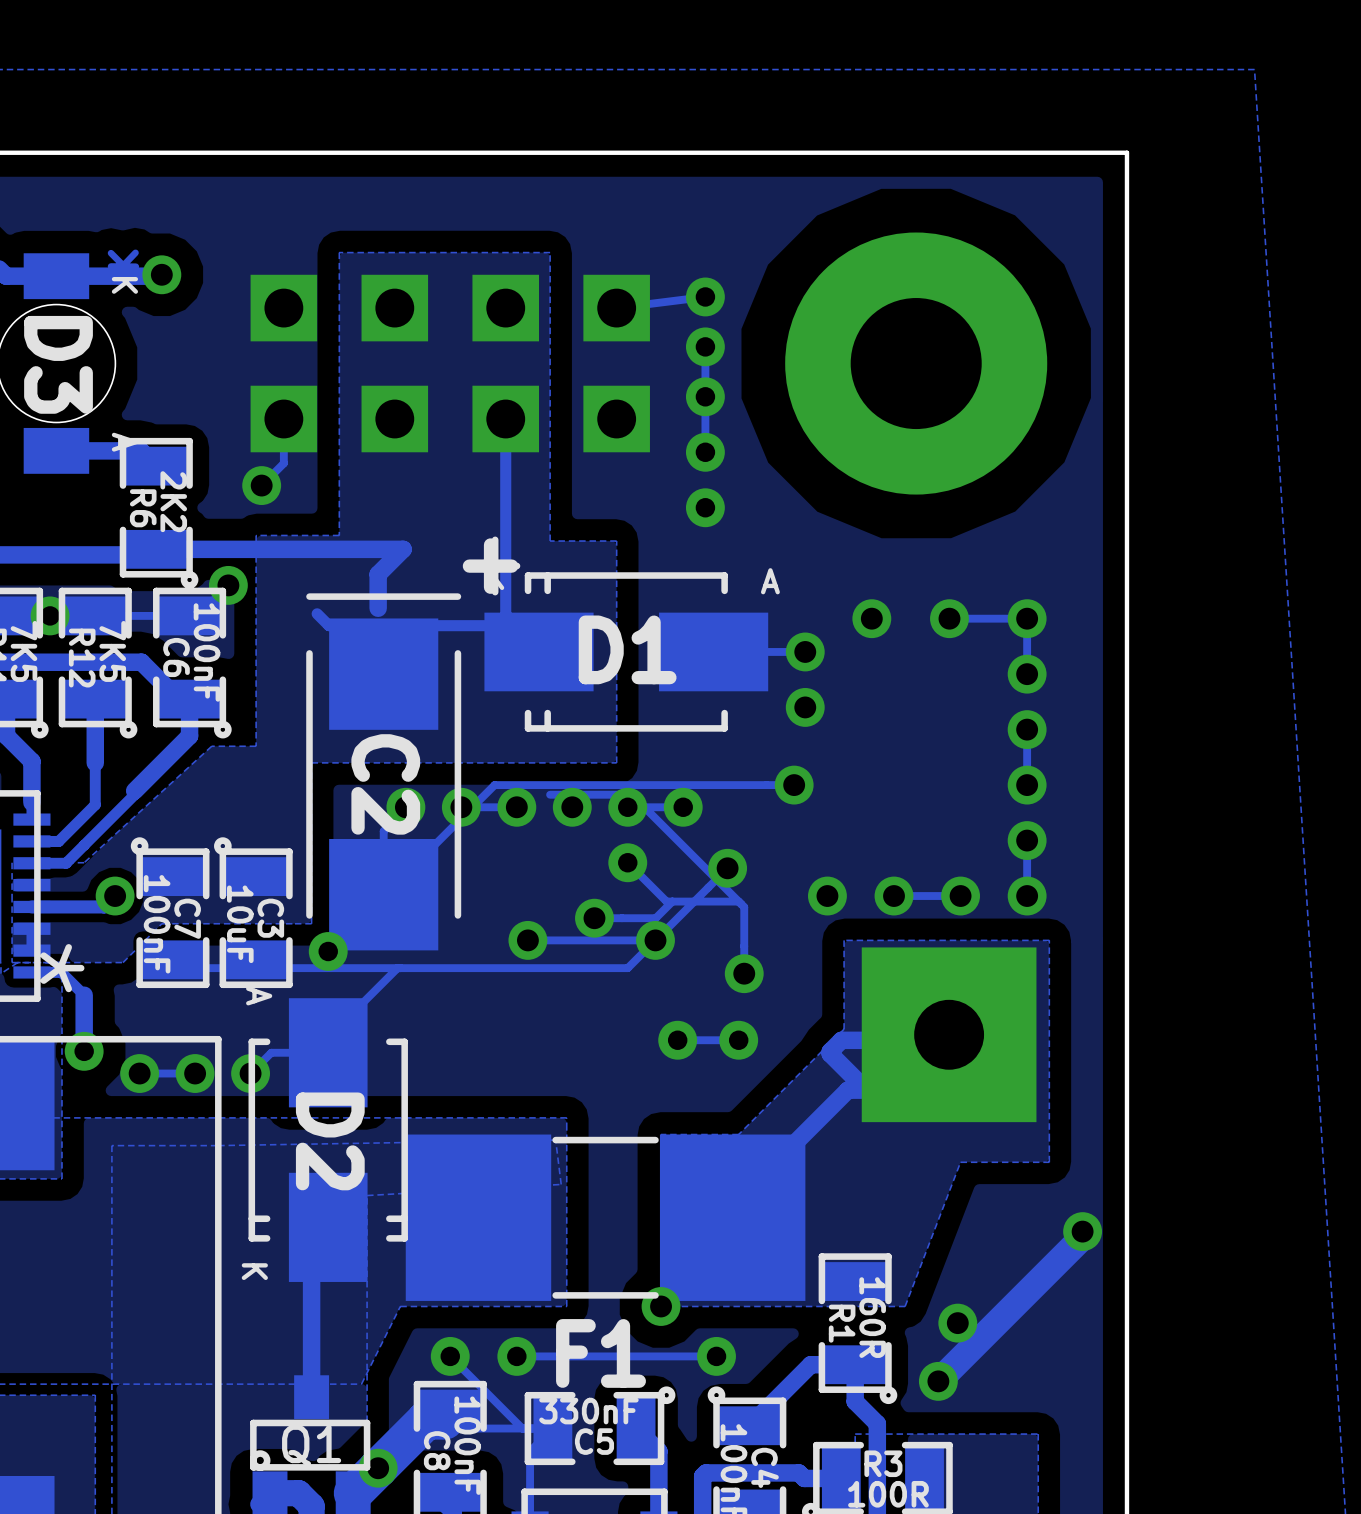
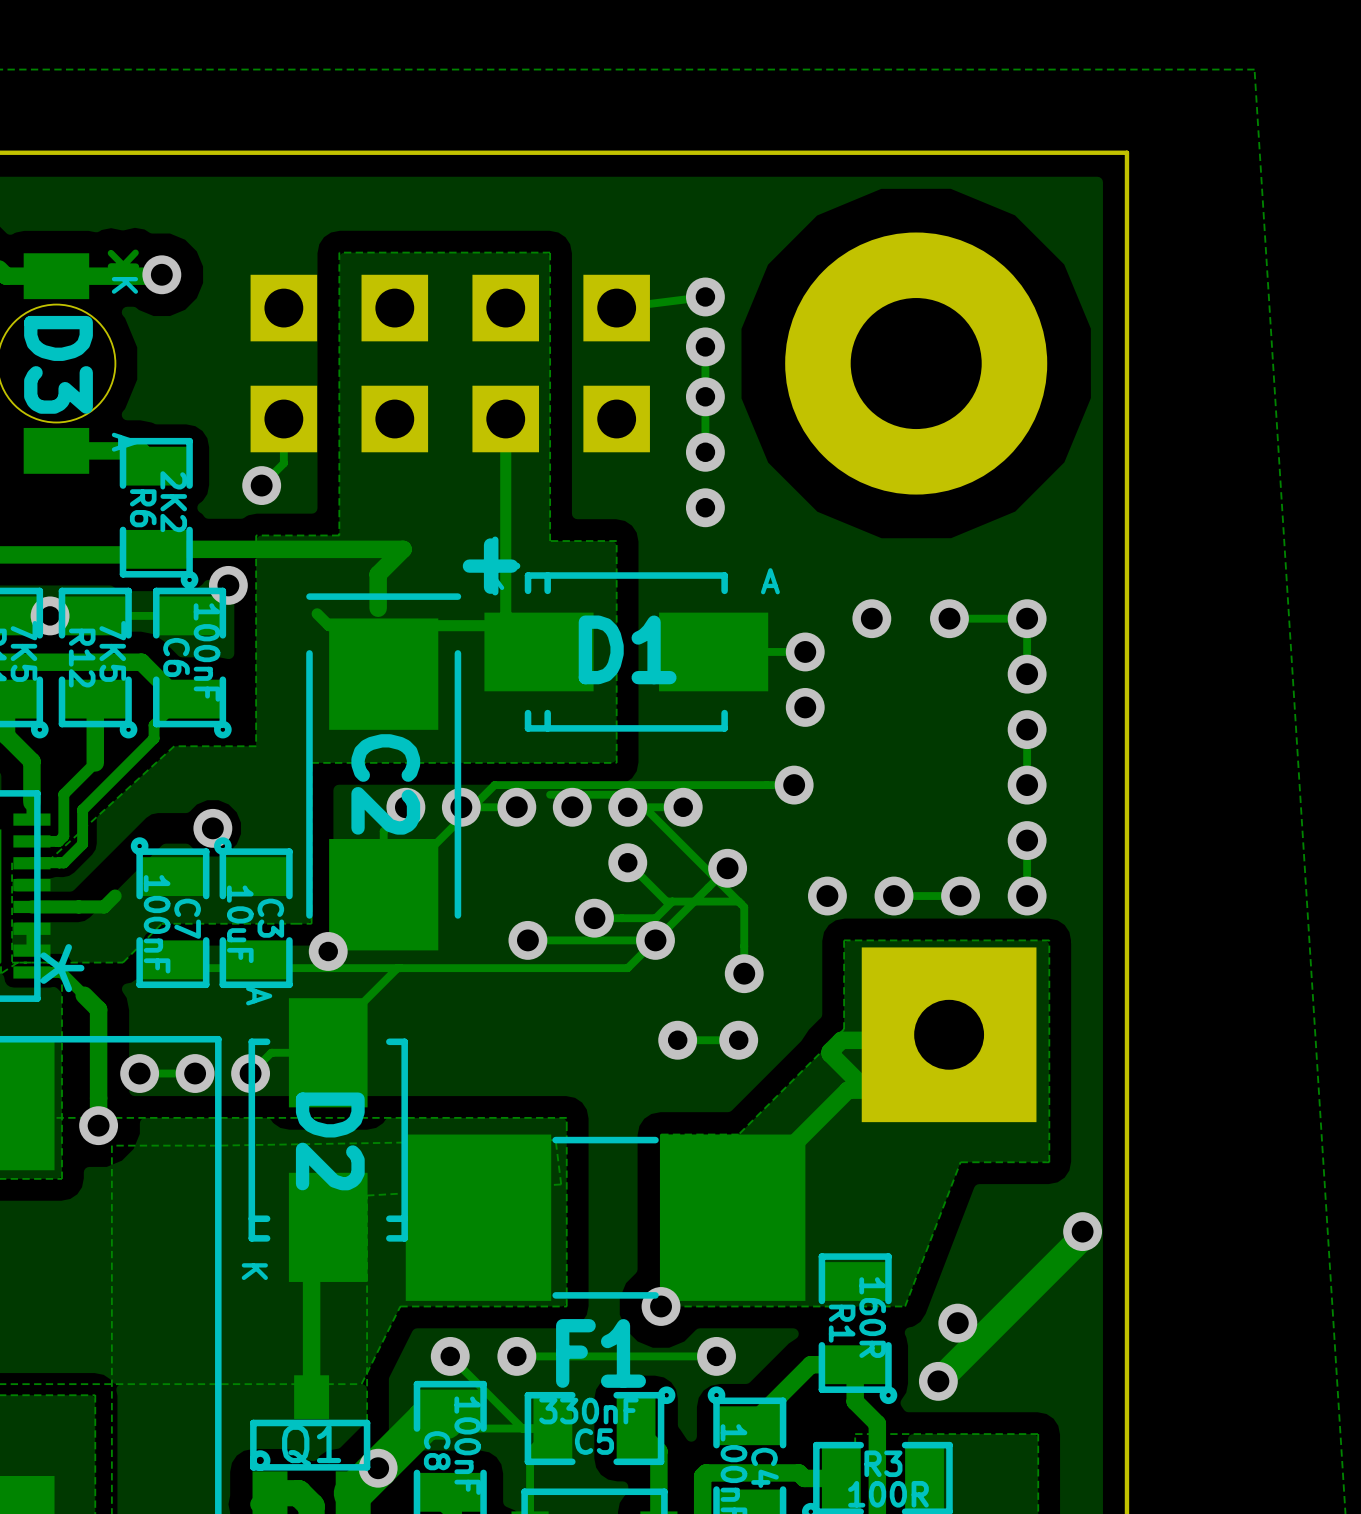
track: (189, 699) (189, 735) (134, 790) (134, 794) (66, 863) (31, 863) -> (189, 699) (180, 699) (154, 725) (154, 738) (82, 809) (82, 844) (63, 862) (31, 862)
zone outline: (211, 746) (84, 862) (46, 862) -> (211, 746) (174, 746) (46, 862)
track: (95, 762) (95, 804) (63, 836) -> (95, 762) (63, 794) (63, 836)
via: none -> (212, 828)
via: (115, 896) -> none
track: (84, 995) (84, 1051) -> (84, 995) (98, 1009) (98, 1125)
via: (84, 1051) -> none
via: none -> (98, 1125)

